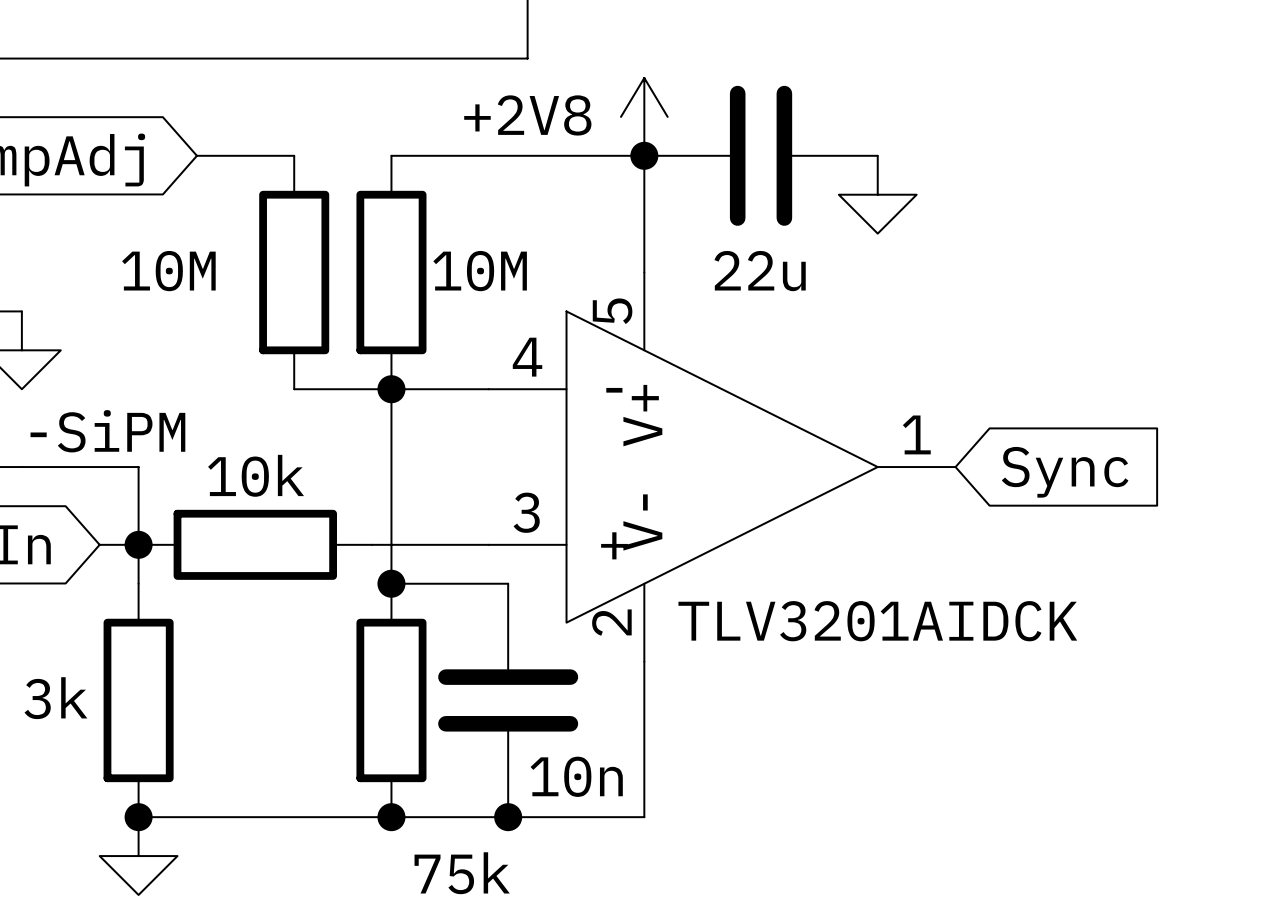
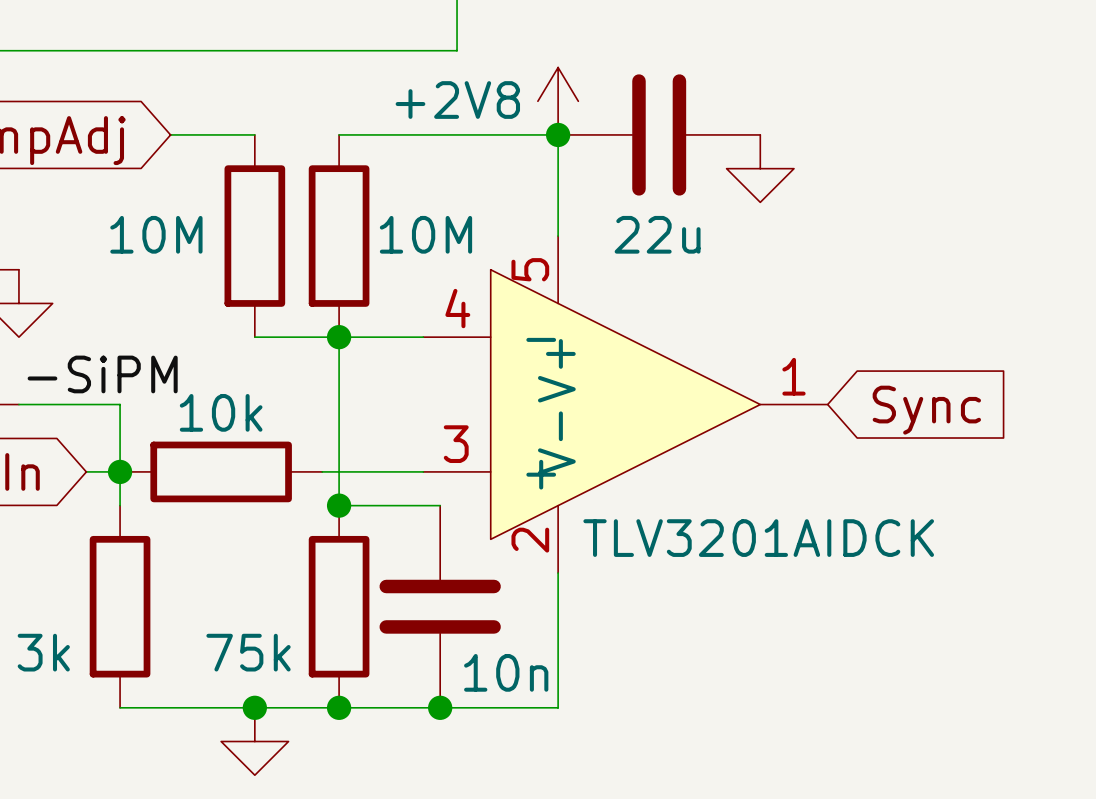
part value position: 3k (55, 698) -> 3k (43, 652)
junction position: (138, 817) -> (254, 707)
power symbol position: (138, 856) -> (254, 741)
part value position: 75k (462, 873) -> 75k (248, 652)

